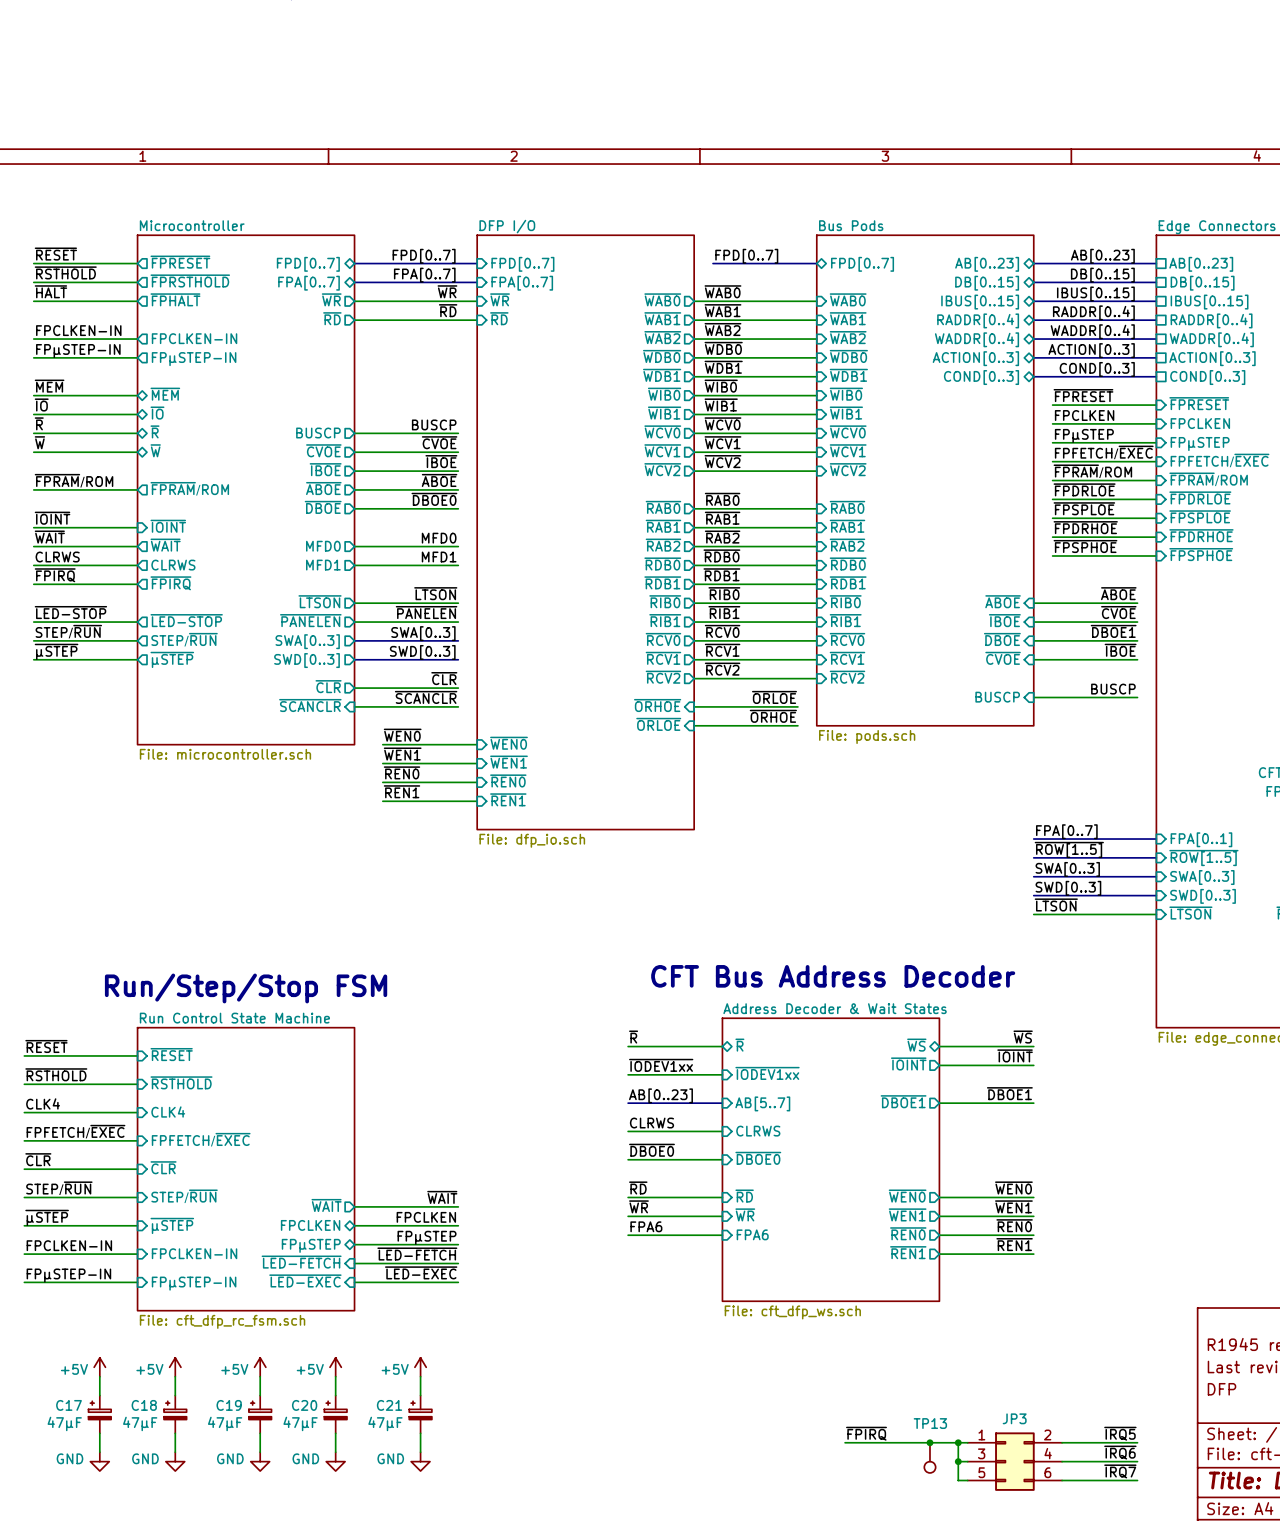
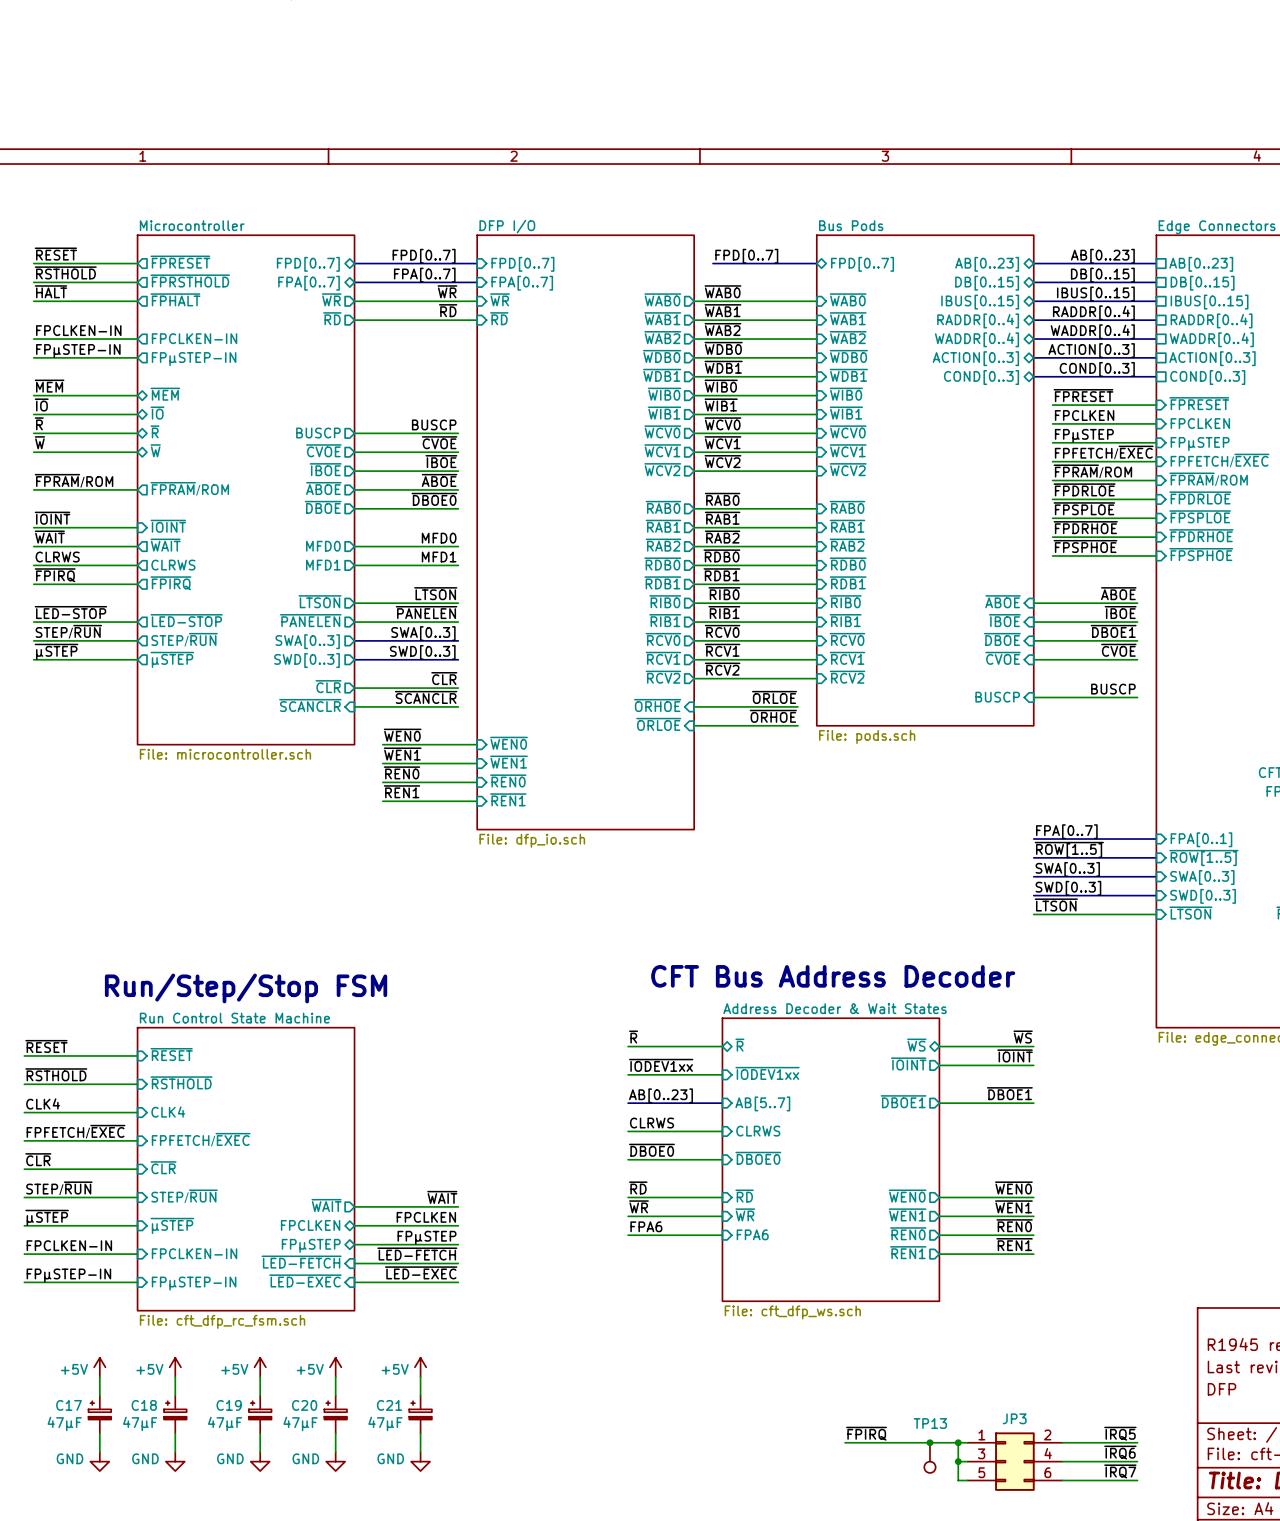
label: ~{CVOE} (1118, 612) -> ~{IBOE} (1120, 612)
label: ~{IBOE} (1120, 650) -> ~{CVOE} (1118, 650)

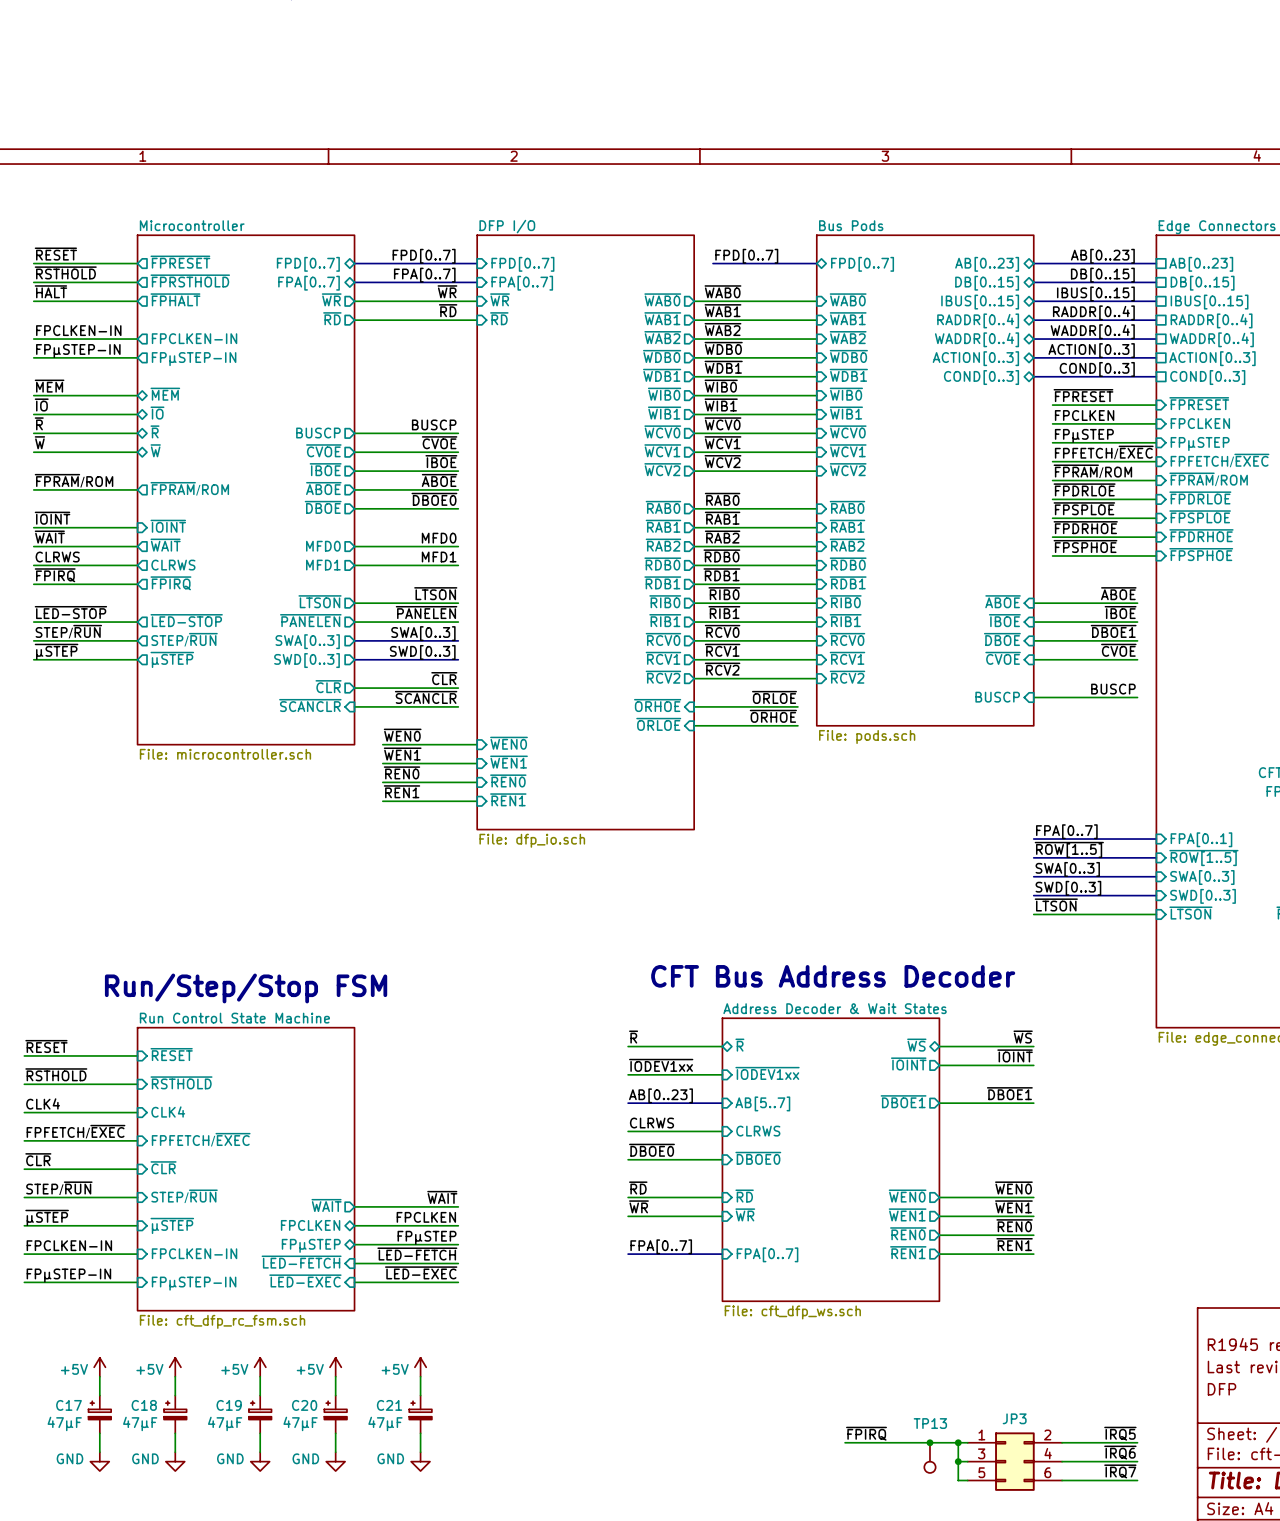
label: FPA6 (646, 1226) -> none
sheet pin: FPA6 (752, 1234) -> none
wire: (628, 1235) (722, 1235) -> none
label: none -> FPA[0..7] (661, 1246)
bus: none -> (628, 1254) (722, 1254)
sheet pin: none -> FPA[0..7] (767, 1254)

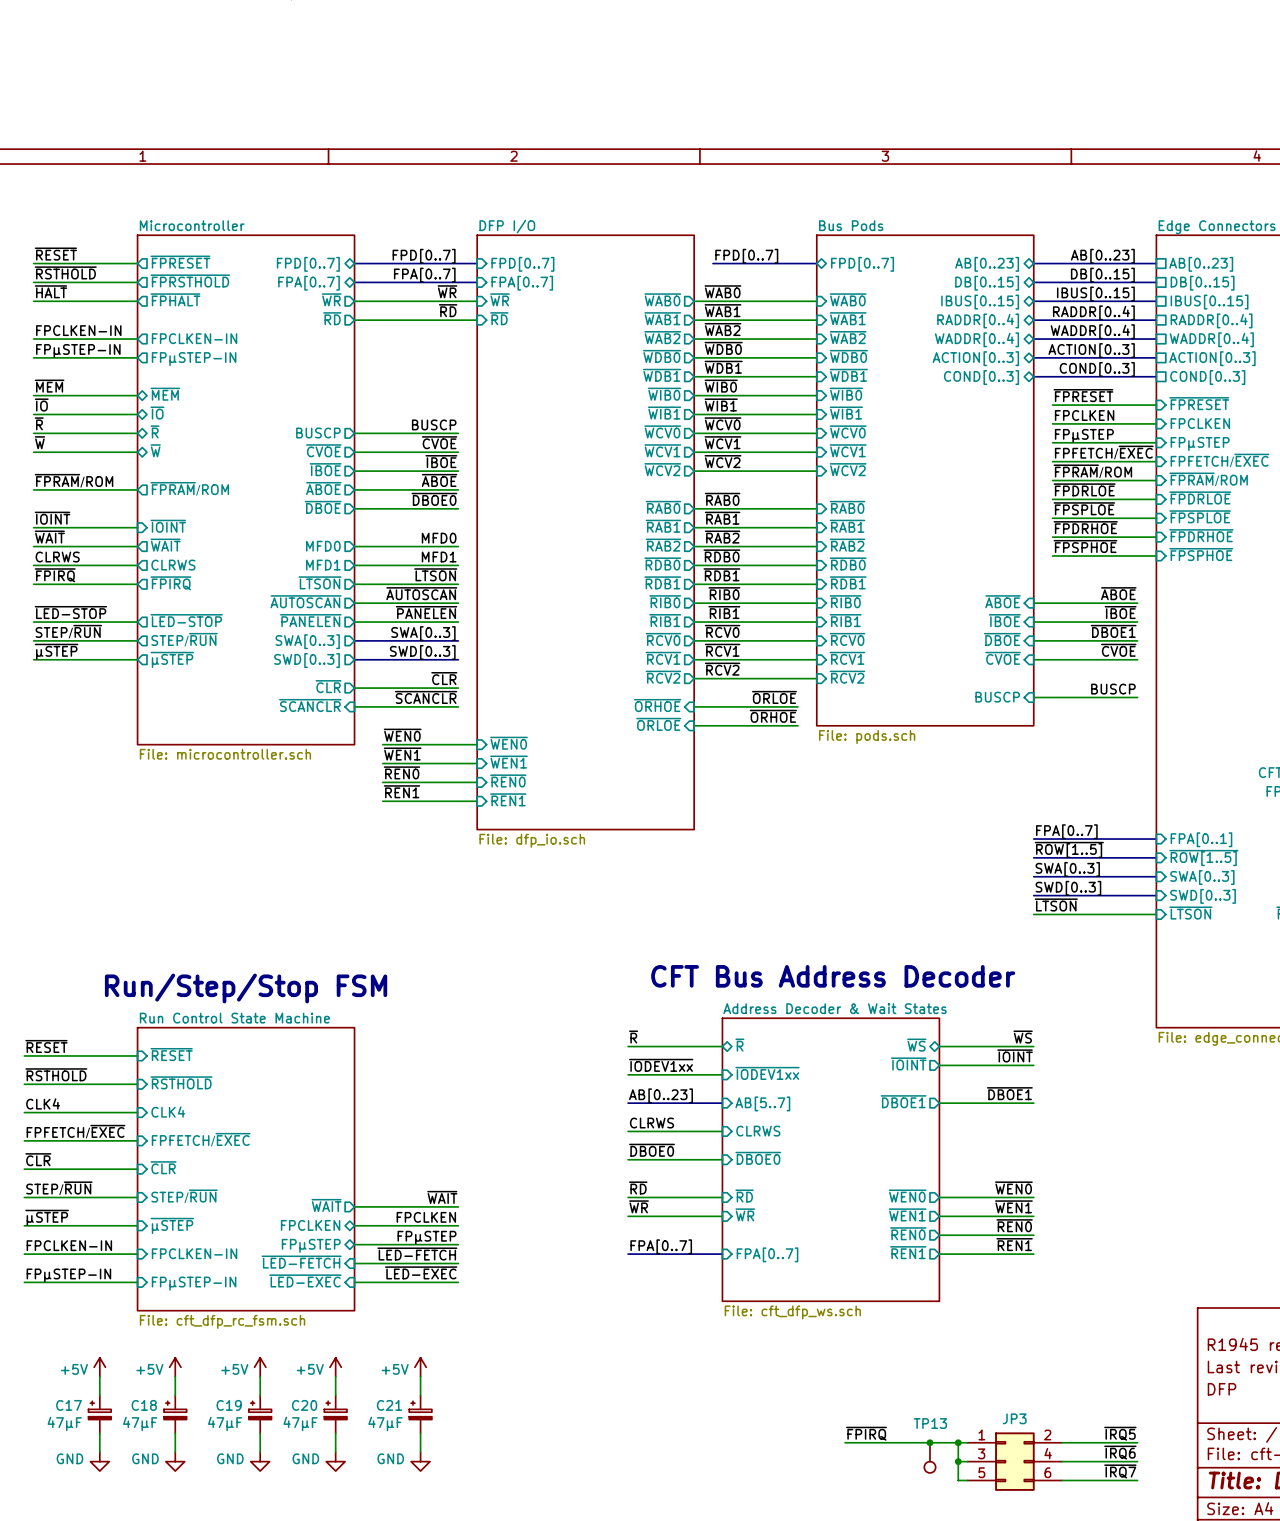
label: none -> ~{LTSON} (435, 574)
sheet pin: none -> ~{LTSON} (320, 582)
wire: none -> (354, 584) (458, 584)
label: ~{LTSON} (435, 593) -> ~{AUTOSCAN} (421, 593)
sheet pin: ~{LTSON} (320, 601) -> ~{AUTOSCAN} (306, 601)

